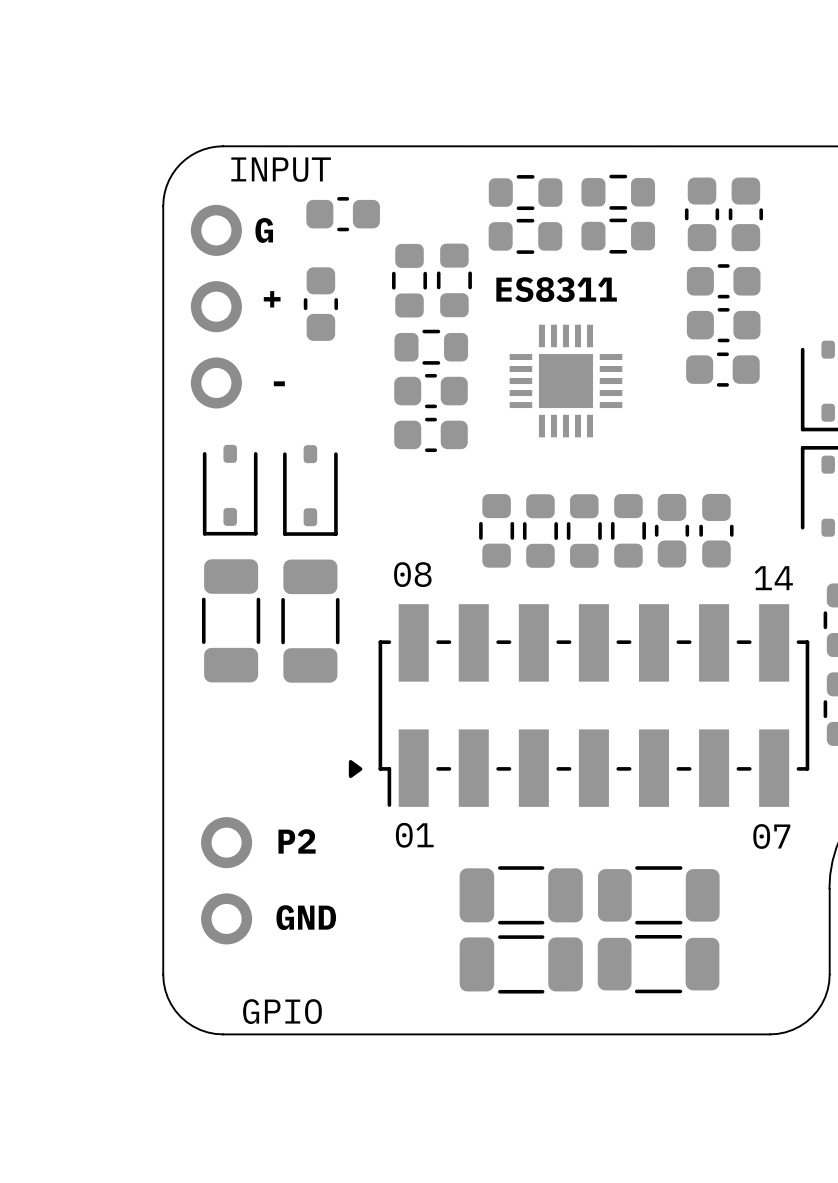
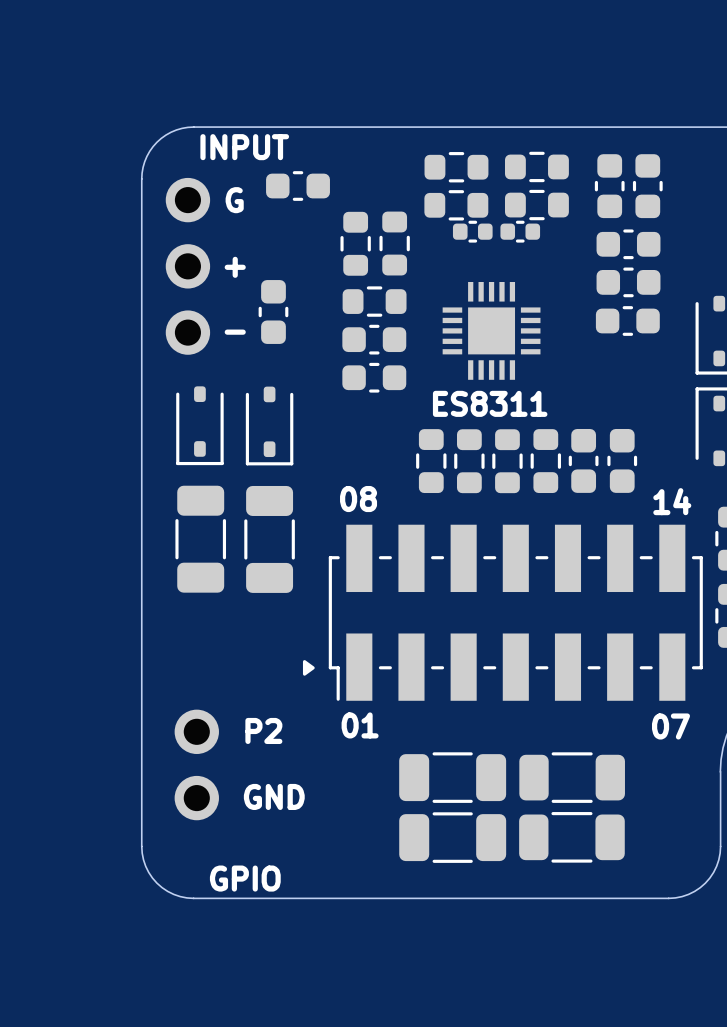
part: none -> (472, 231)
part: none -> (520, 231)
text position: ES8311 (556, 289) -> ES8311 (490, 403)
part position: (320, 304) -> (273, 311)

